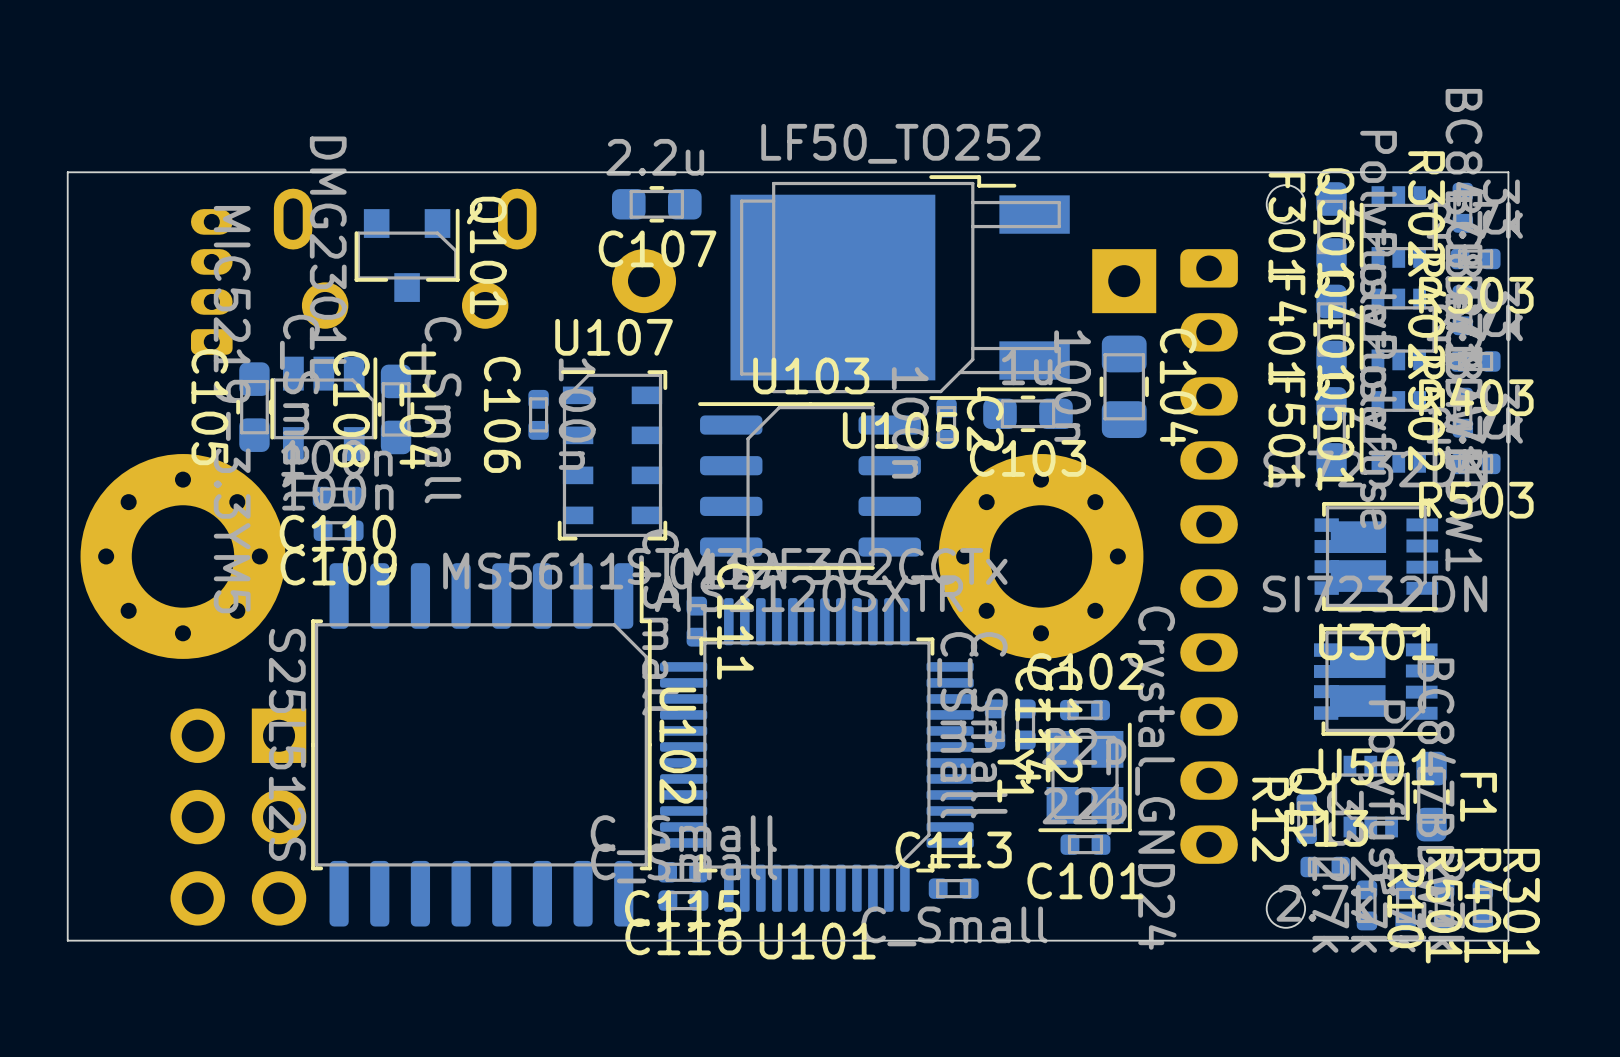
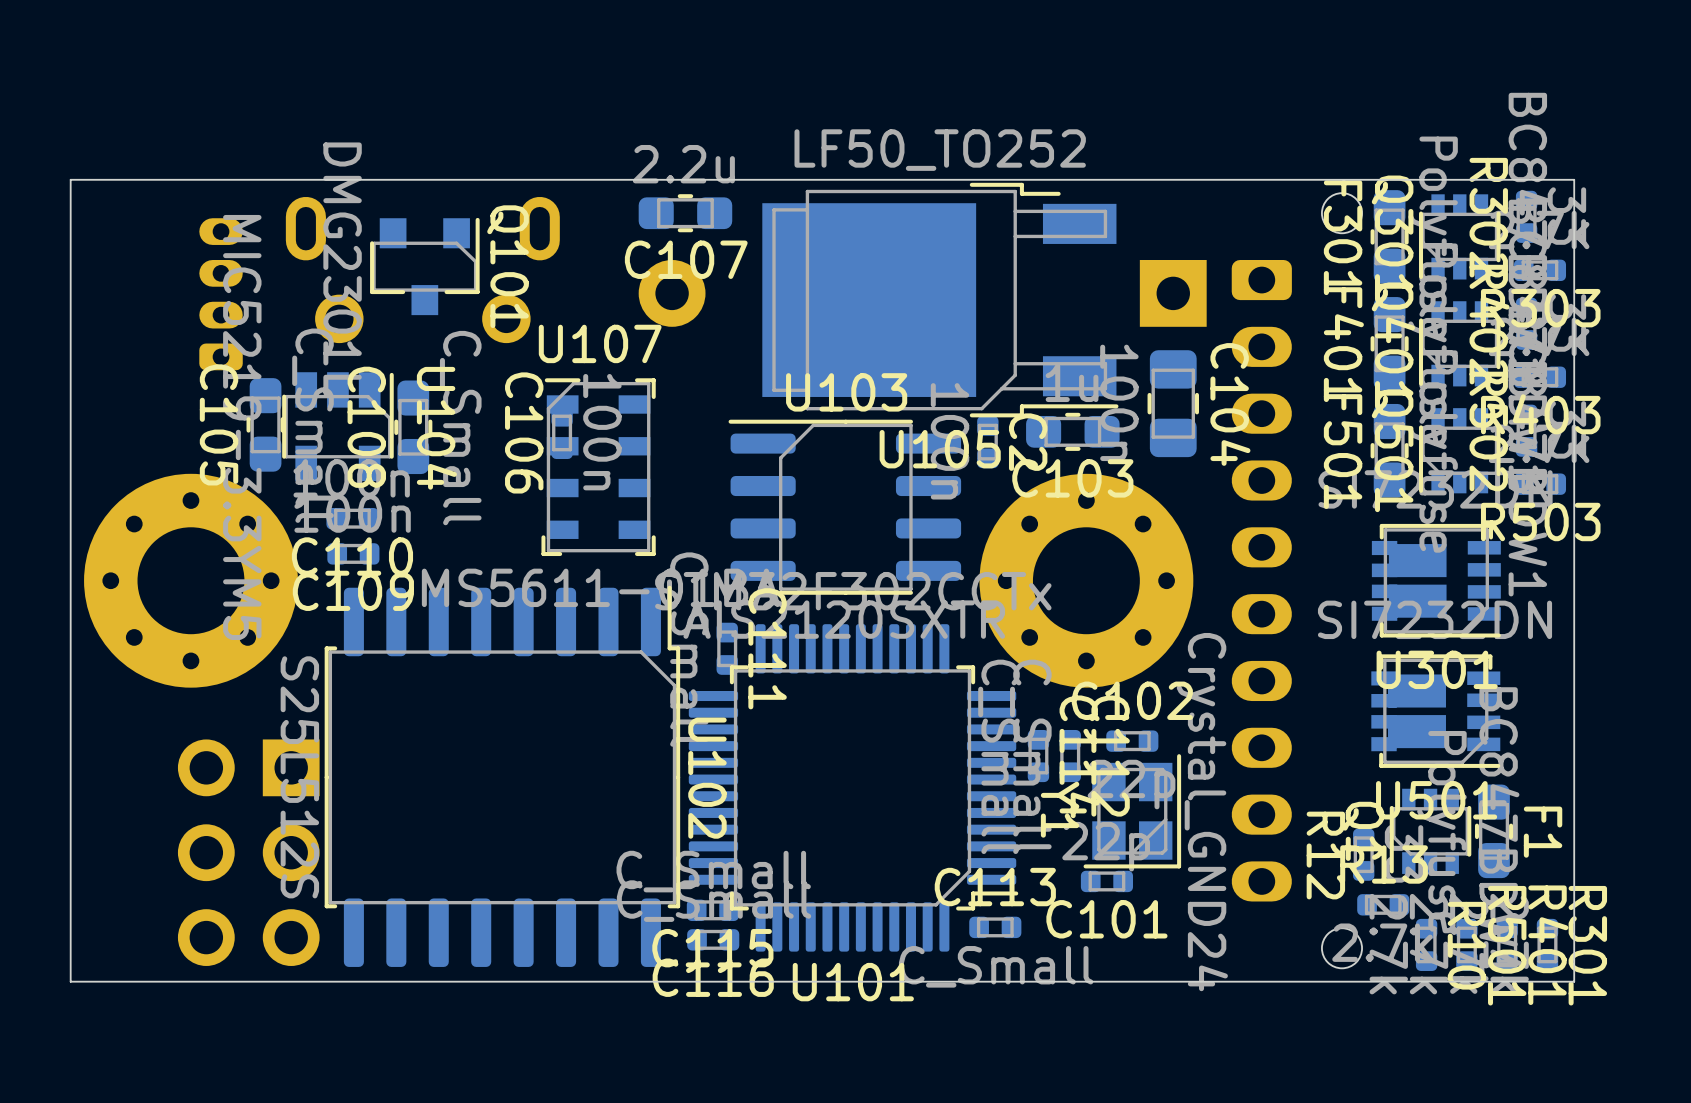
U107 position: (612, 455) -> (598, 467)
C101 position: (1085, 844) -> (1106, 881)

